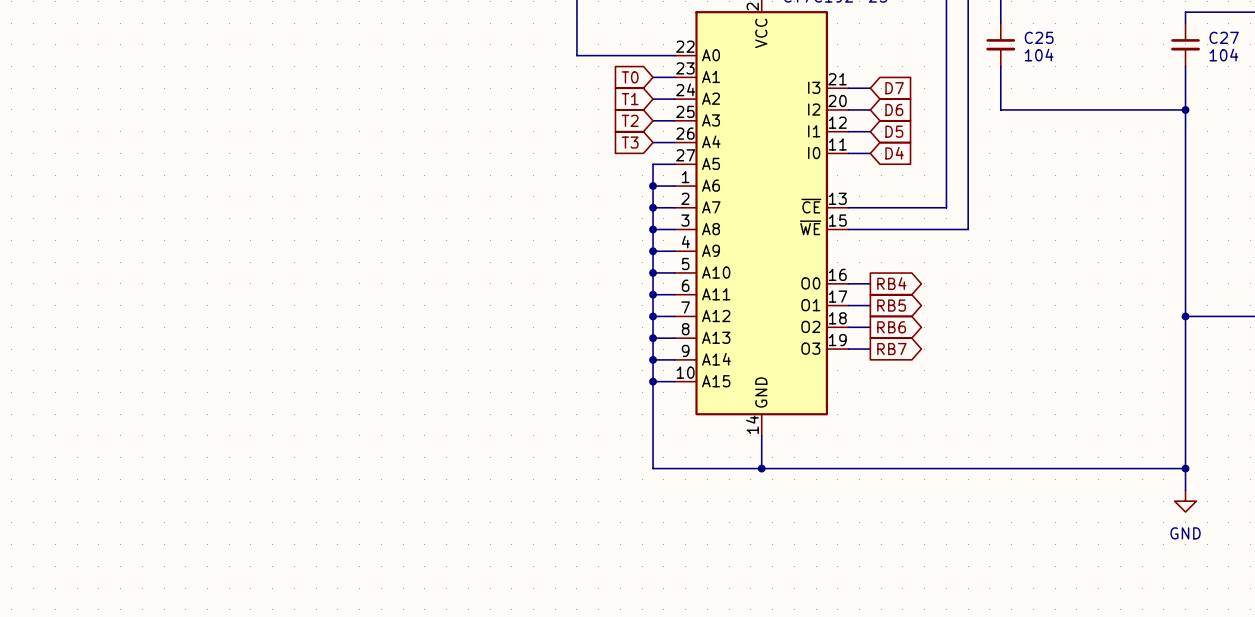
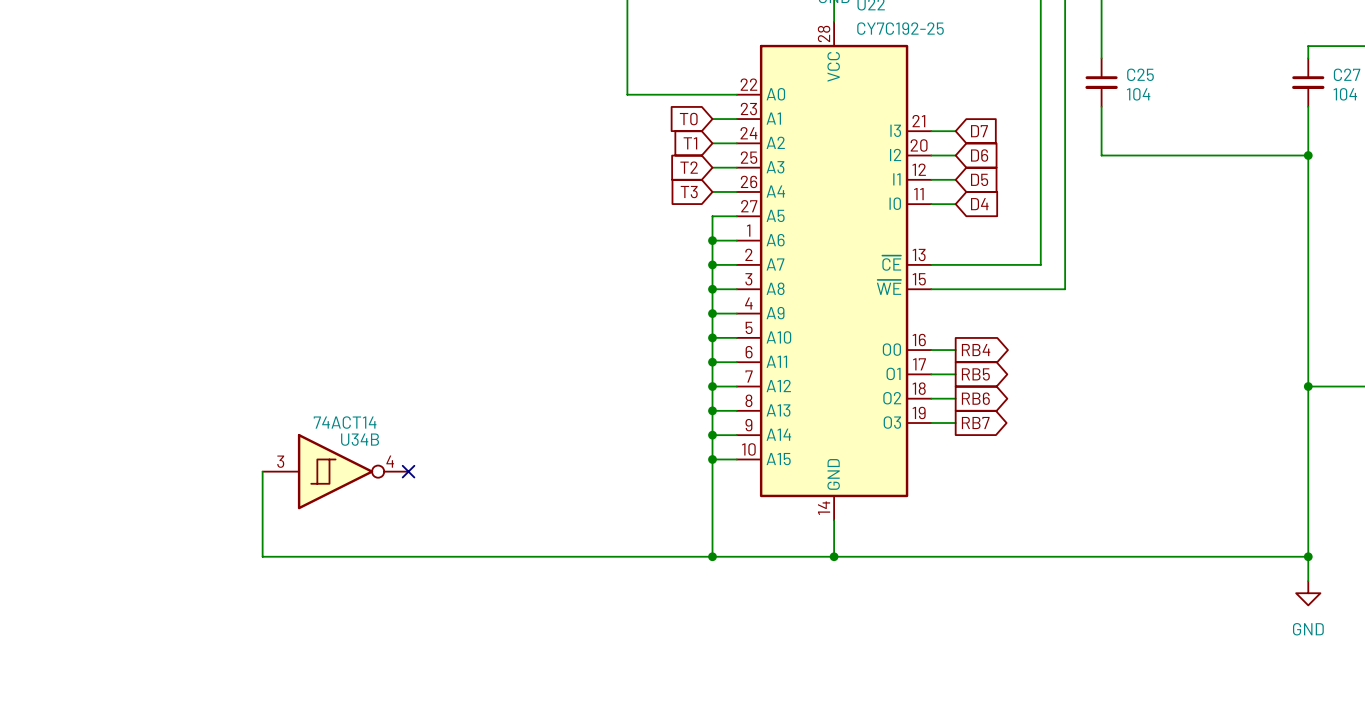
wire: none -> (262, 471) (262, 556) (712, 556)
U34B: none -> 74ACT14 (335, 471)
no-connect mark: none -> (408, 471)
junction: none -> (712, 556)

